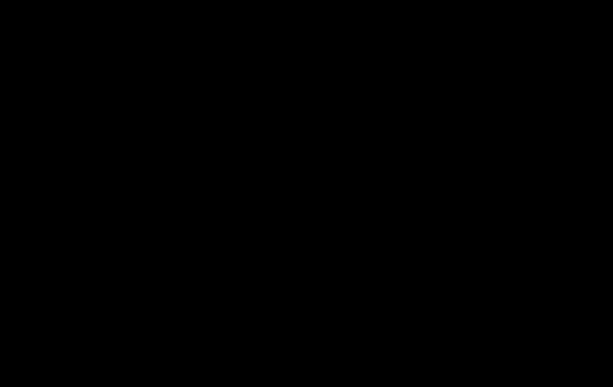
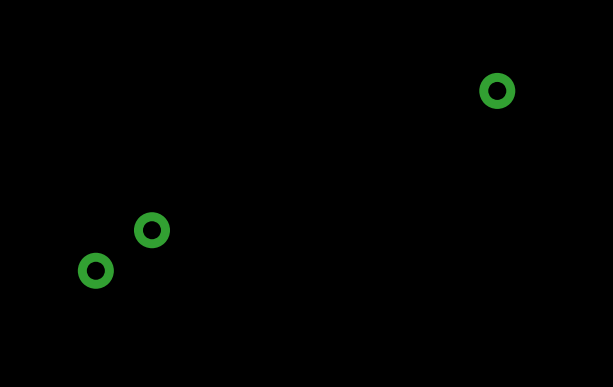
part: none -> (497, 90)
part: none -> (151, 230)
part: none -> (95, 270)

